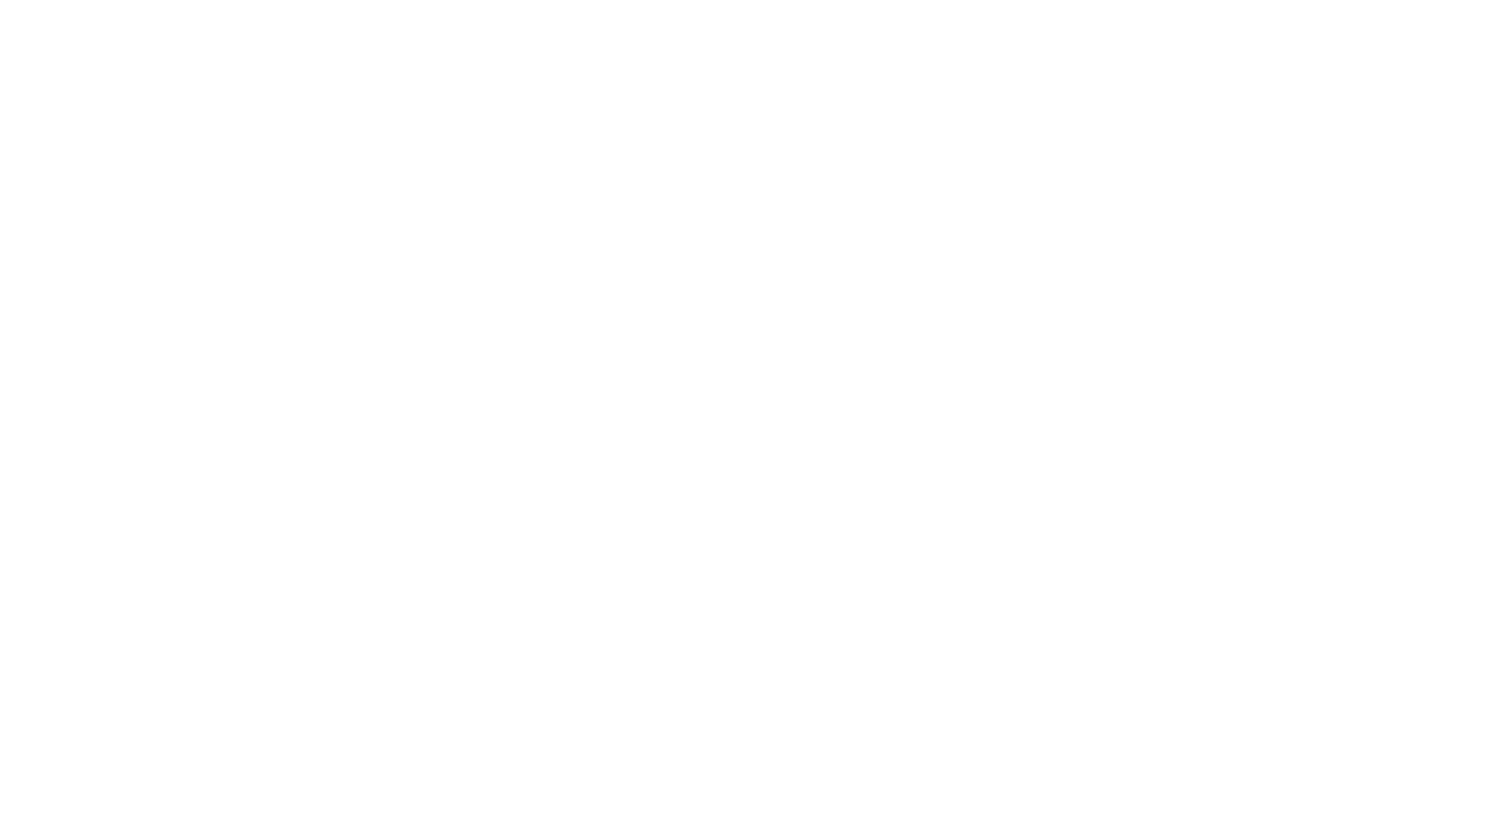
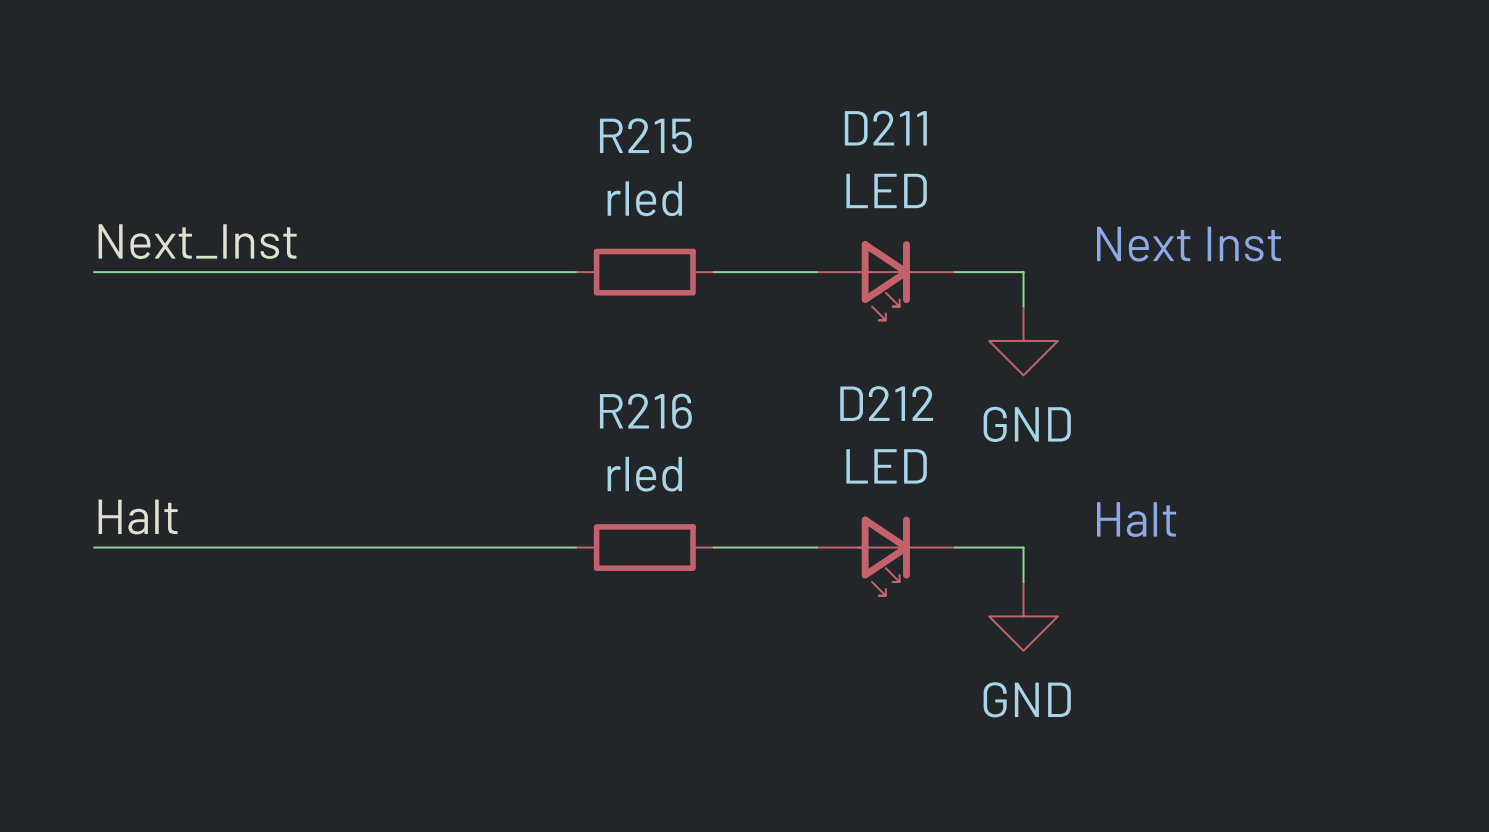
label: none -> Next_Inst (197, 241)
text: none -> Next Inst (1189, 244)
wire: none -> (93, 272) (575, 272)
R215: none -> rled (644, 272)
wire: none -> (713, 272) (816, 272)
wire: none -> (954, 272) (1023, 272) (1023, 306)
D211: none -> LED (885, 280)
power symbol: none -> GND (1023, 340)
label: none -> Halt (138, 517)
text: none -> Halt (1136, 519)
wire: none -> (93, 547) (575, 547)
R216: none -> rled (644, 547)
wire: none -> (713, 547) (816, 547)
wire: none -> (954, 547) (1023, 547) (1023, 581)
D212: none -> LED (885, 556)
power symbol: none -> GND (1023, 616)

